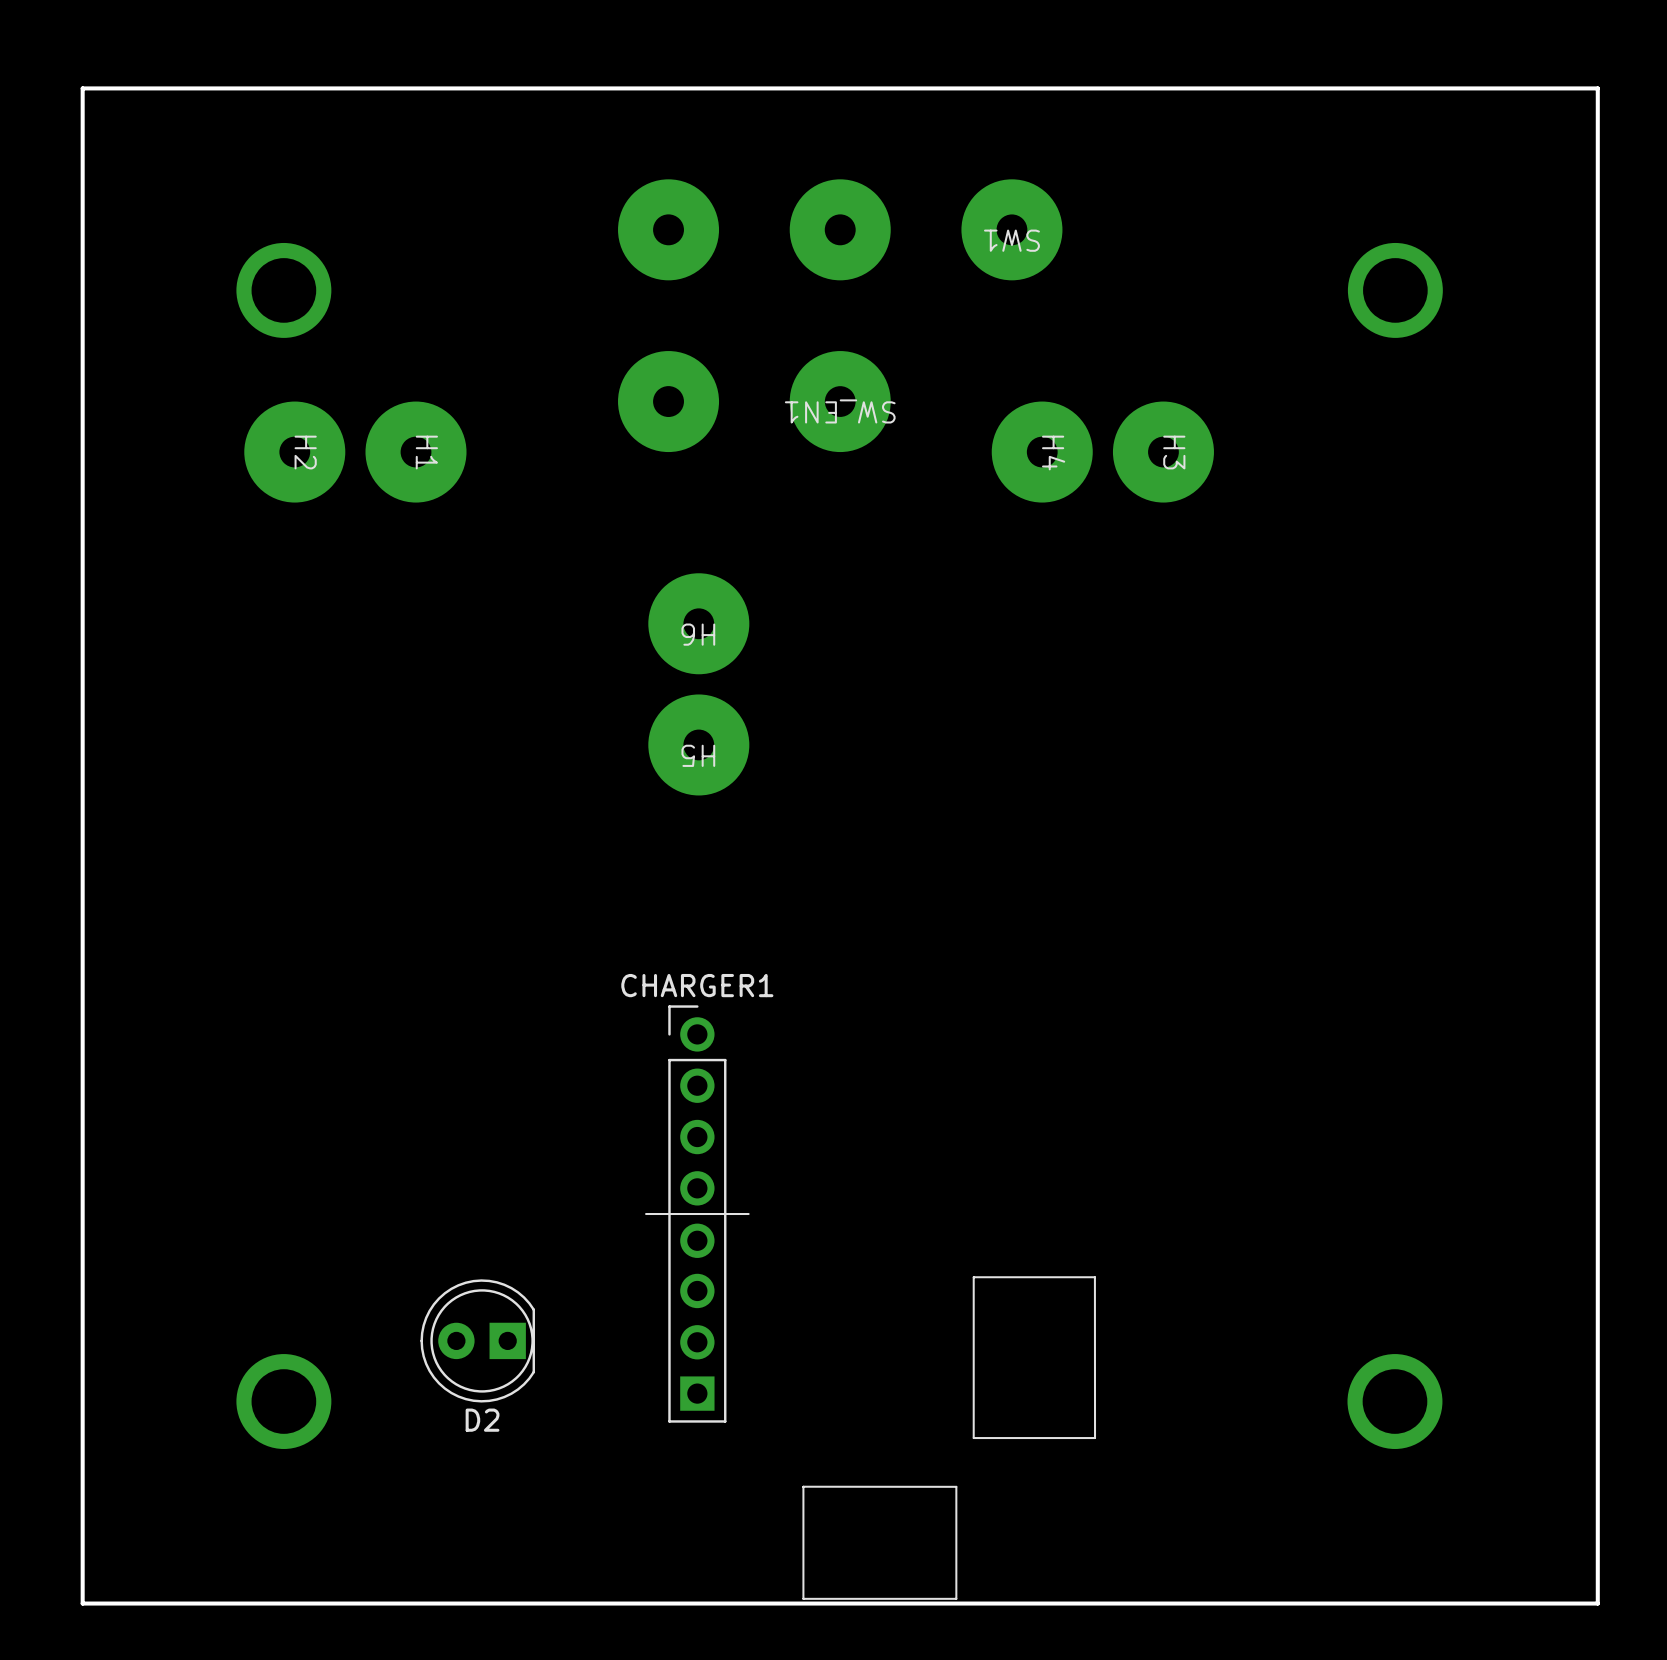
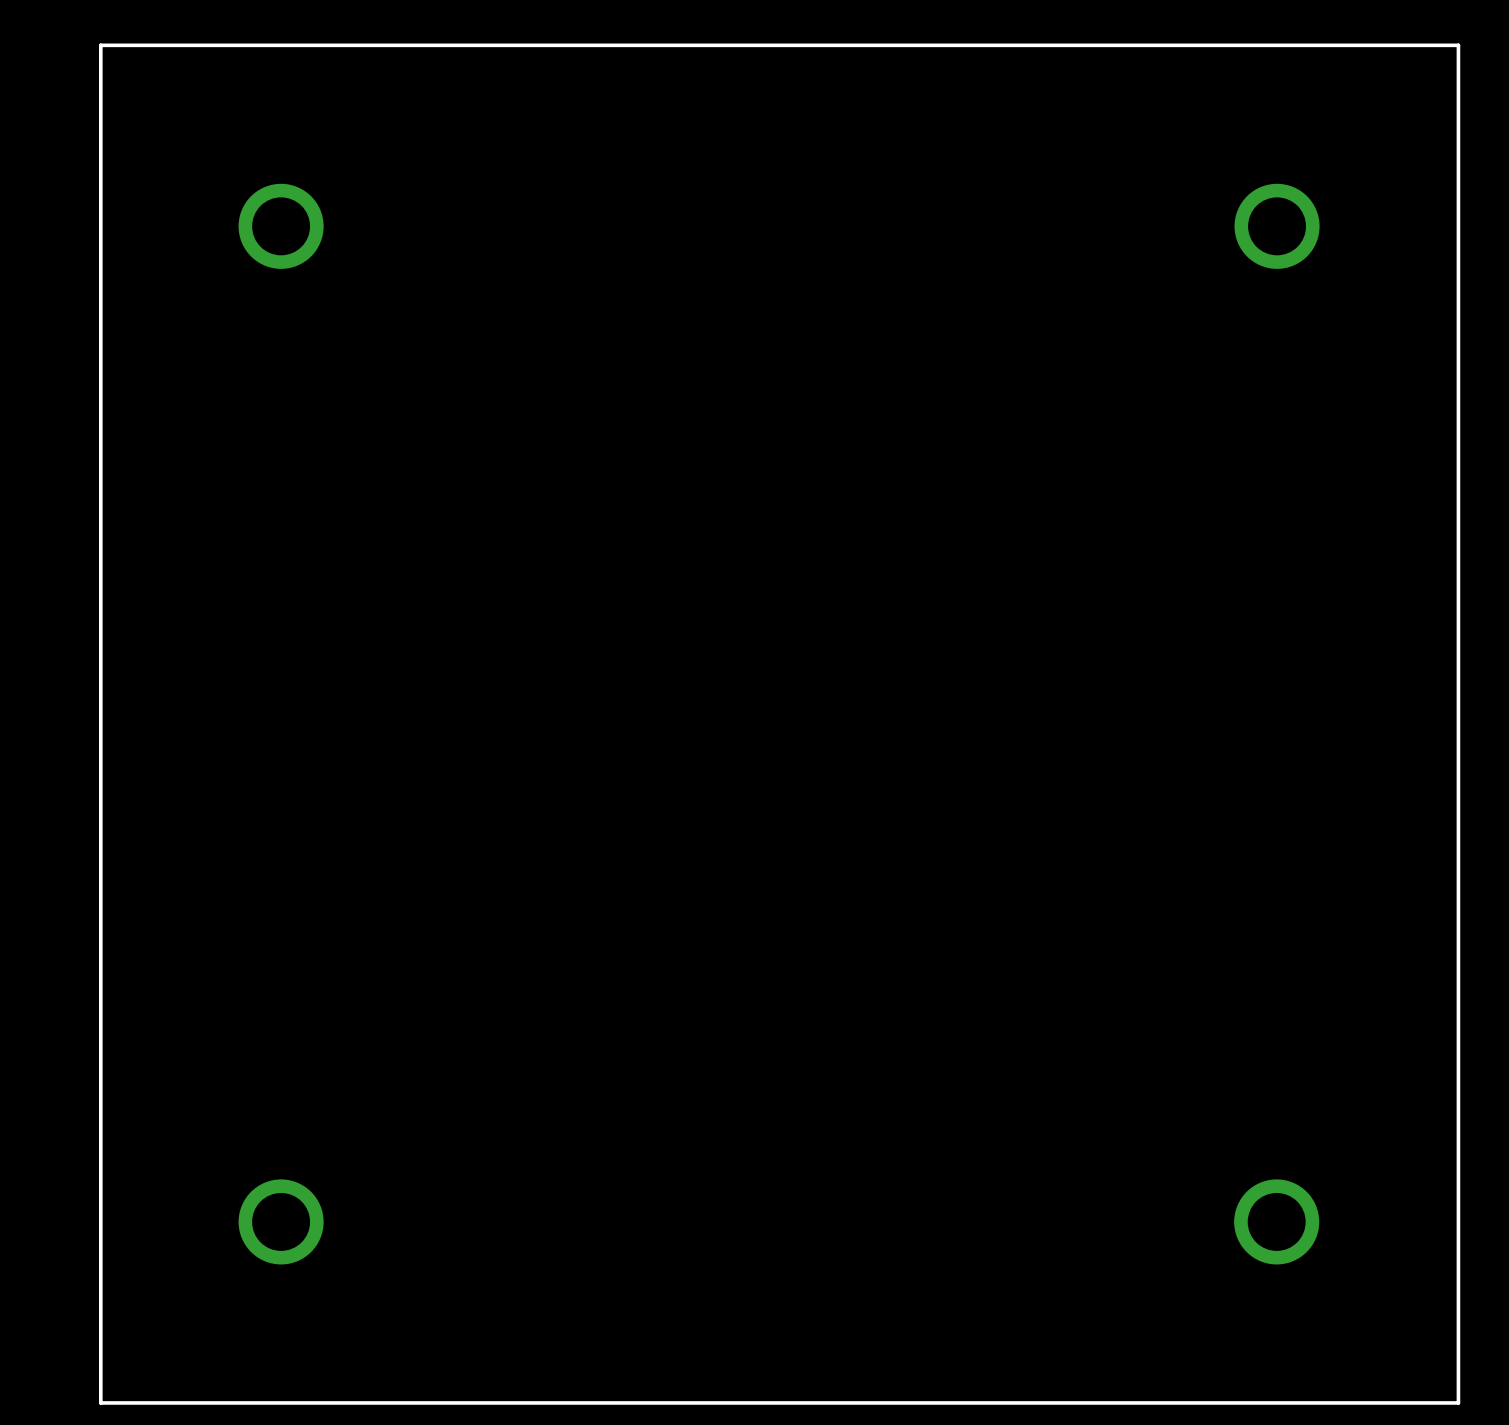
SW1: (840, 229) -> none
SW_EN1: (754, 401) -> none
H2: (294, 452) -> none
H1: (416, 452) -> none
H4: (1042, 452) -> none
H3: (1163, 452) -> none
H6: (698, 623) -> none
H5: (698, 744) -> none
CHARGER1: (870, 1302) -> none
D2: (477, 1340) -> none

